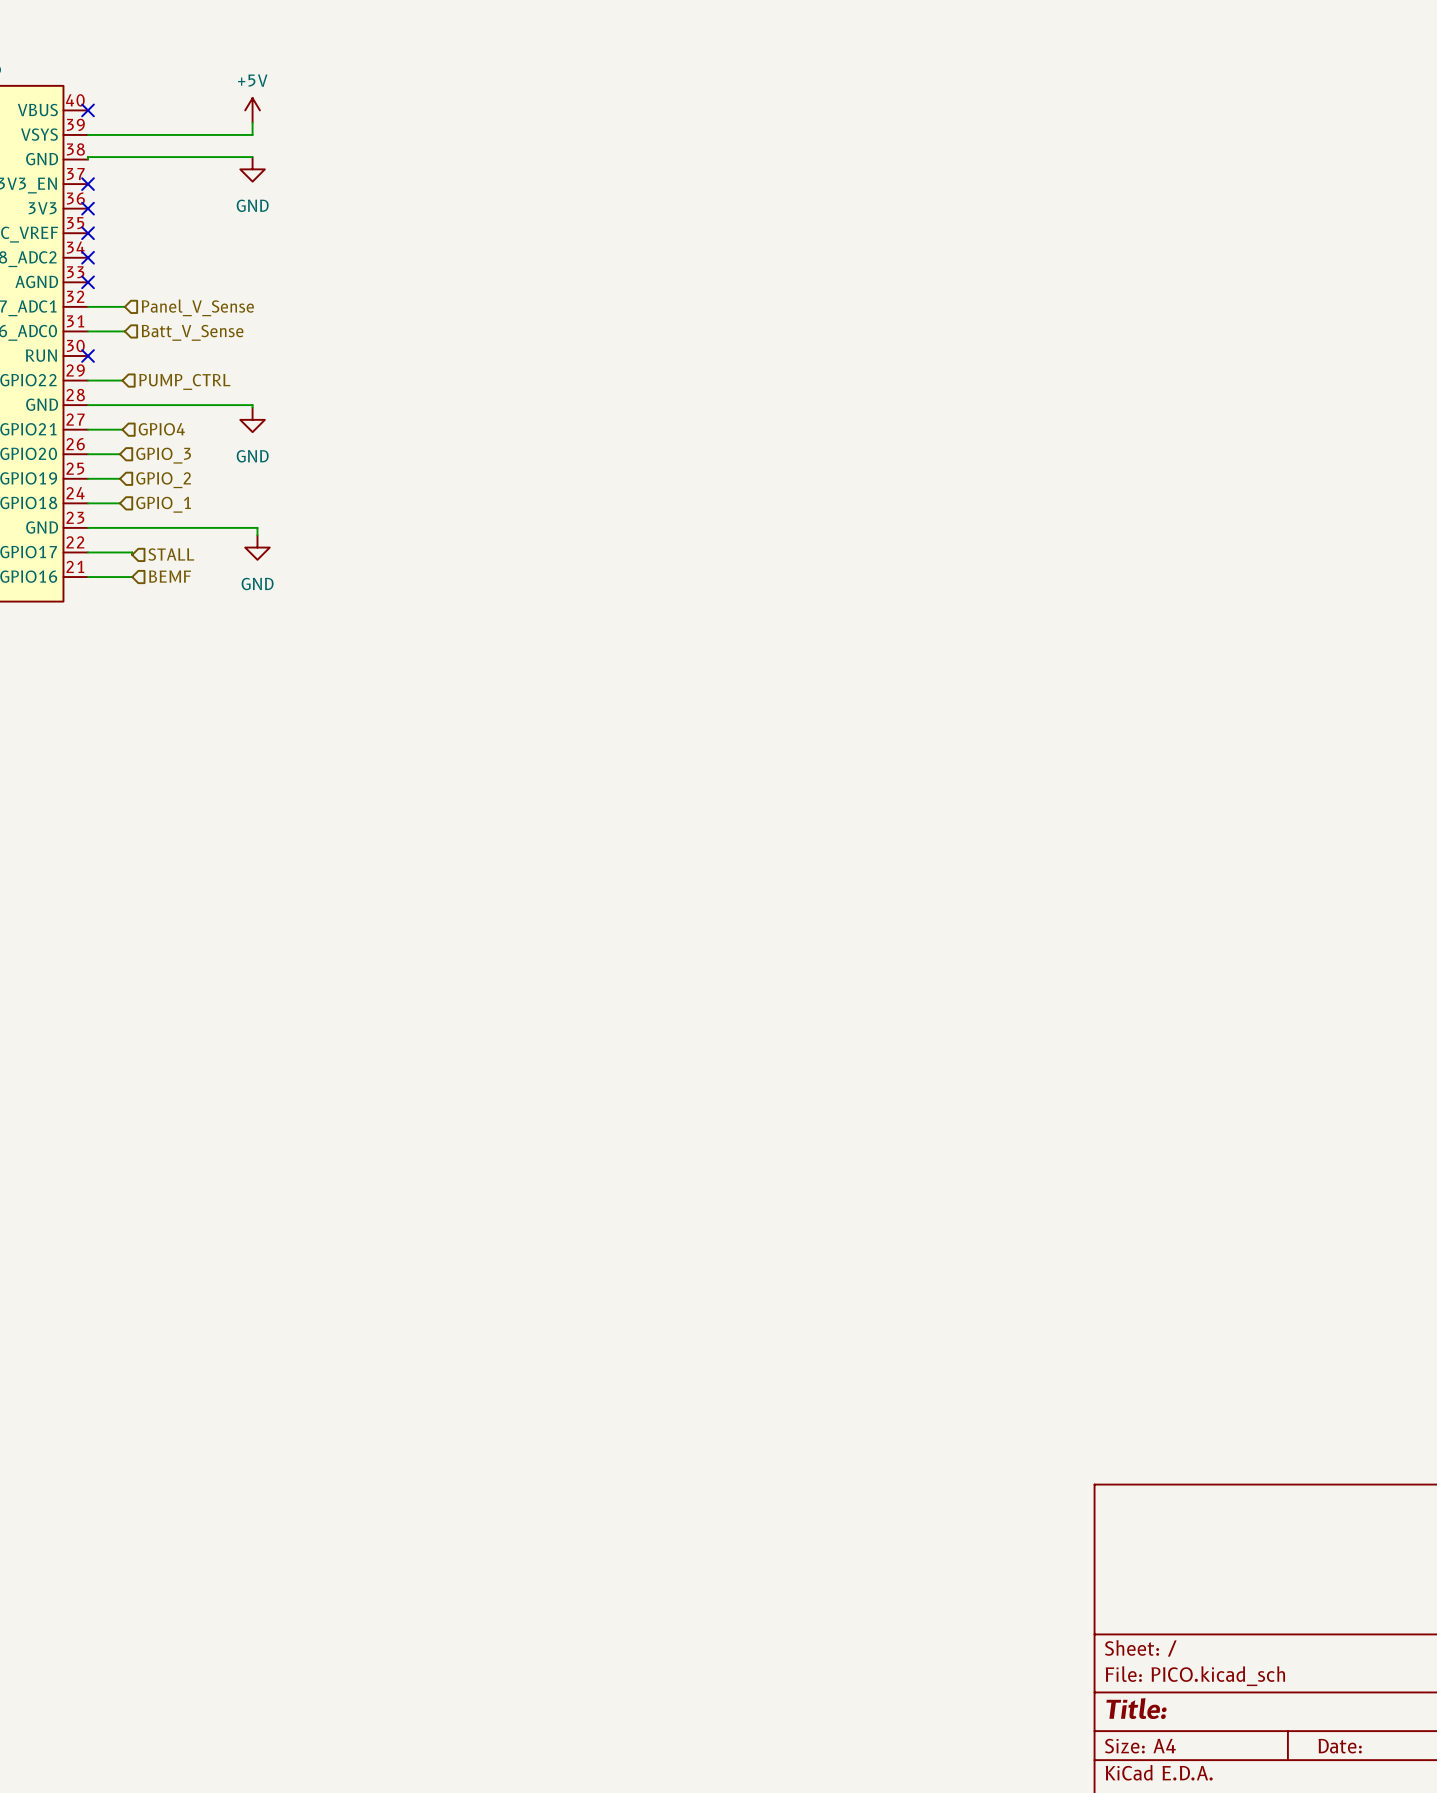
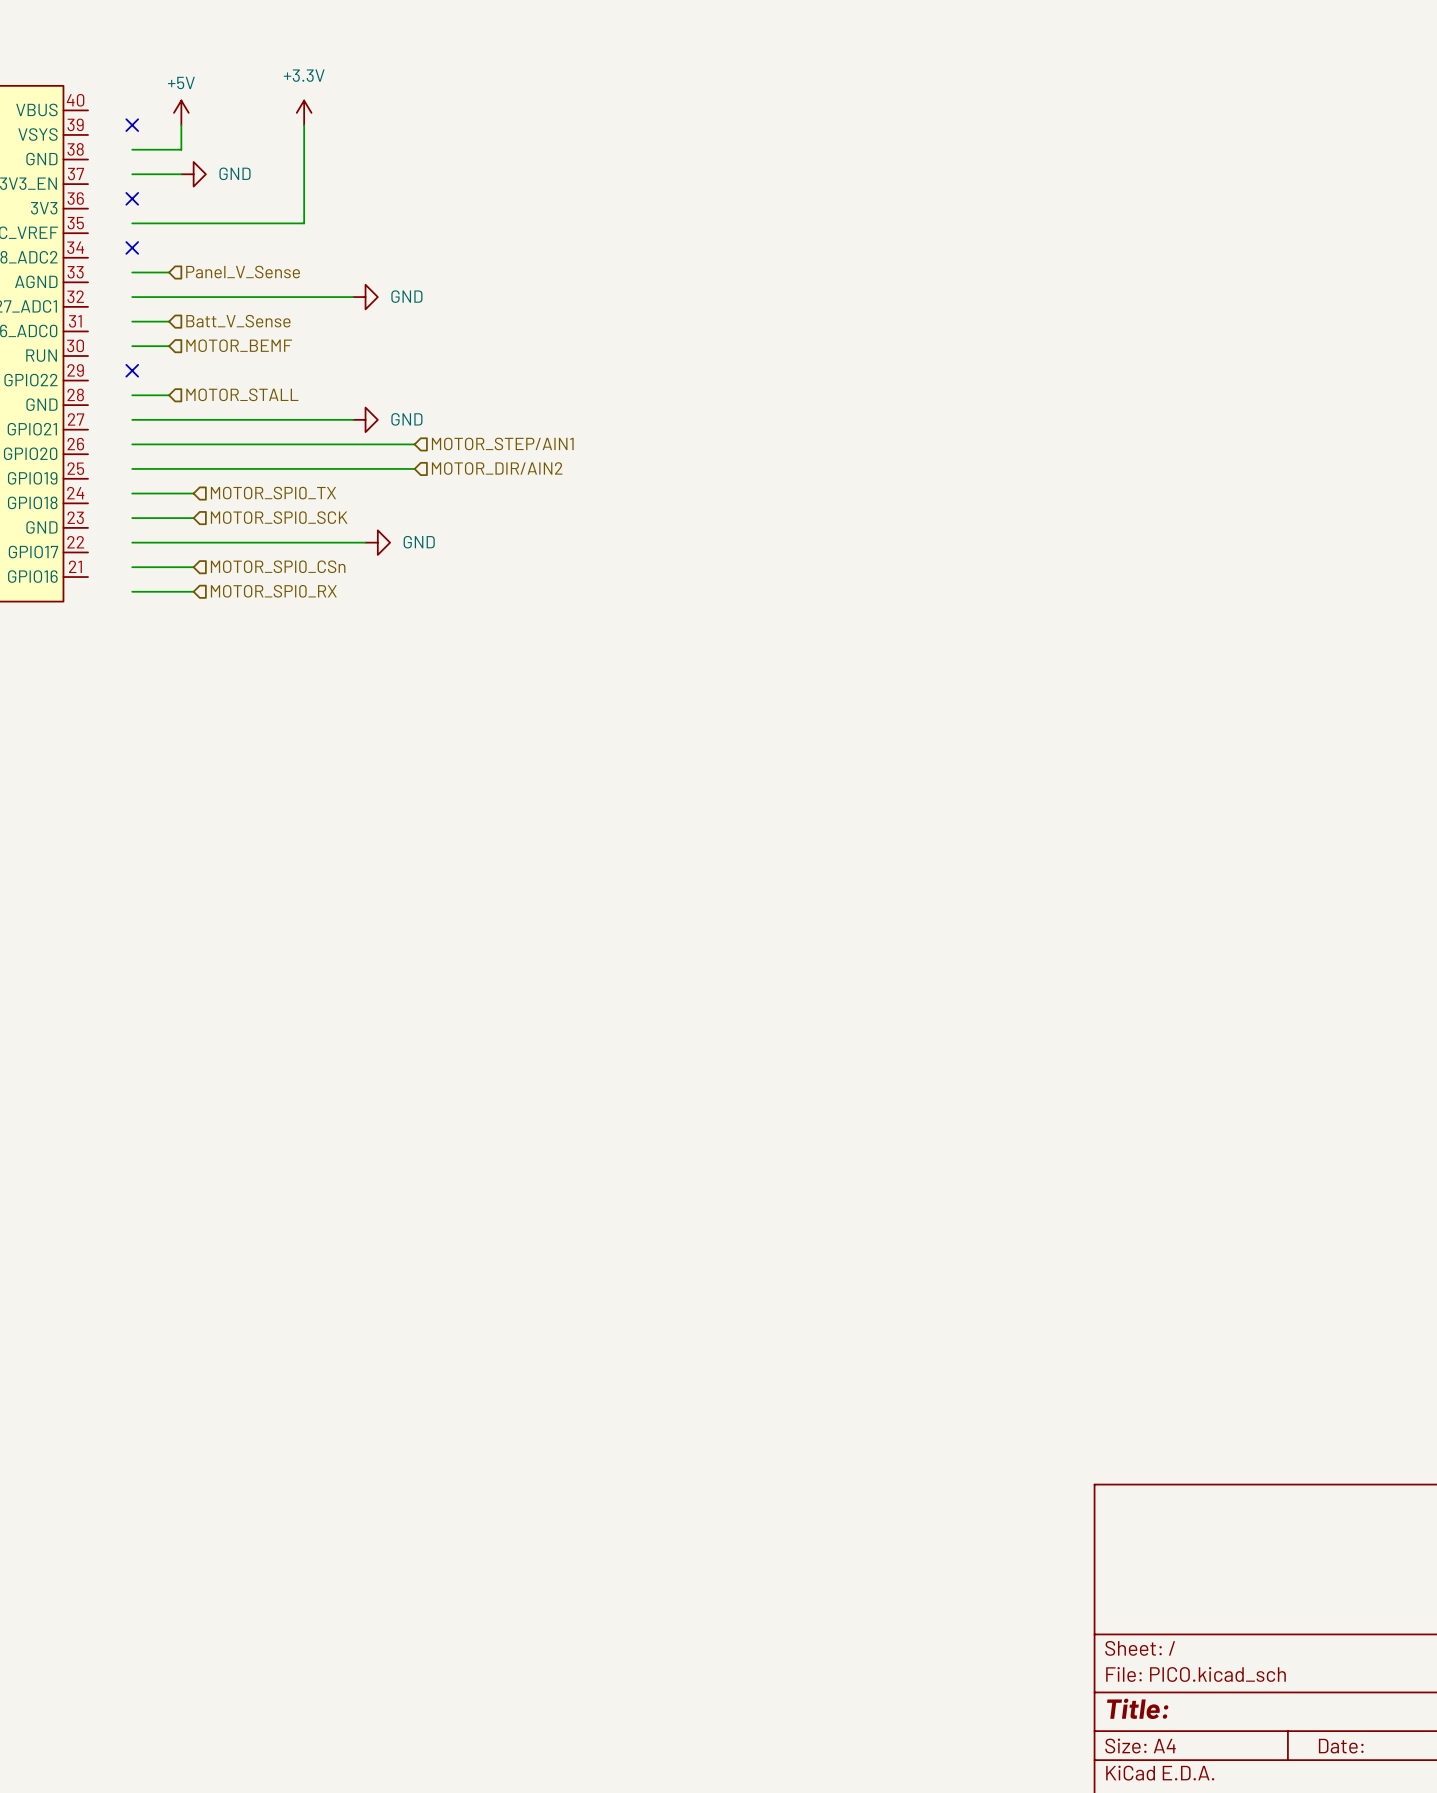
no-connect mark: (88, 110) -> none
power symbol position: +5V (252, 110) -> +5V (181, 112)
power symbol: none -> +3.3V (304, 112)
wire: (252, 122) (252, 134) (88, 134) -> none
no-connect mark: none -> (132, 125)
wire: none -> (181, 125) (181, 149) (132, 149)
wire: none -> (304, 125) (304, 223) (132, 223)
wire: (252, 157) (88, 157) (88, 159) -> none
power symbol rotation: 0° (252, 169) -> 90° counterclockwise (193, 174)
power symbol position: GND (252, 169) -> GND (193, 174)
wire: none -> (132, 174) (181, 174)
no-connect mark: (88, 184) -> none
no-connect mark: none -> (132, 198)
no-connect mark: (88, 208) -> none
no-connect mark: (88, 233) -> none
no-connect mark: none -> (132, 247)
no-connect mark: (88, 257) -> none
wire: none -> (132, 272) (169, 272)
no-connect mark: (88, 282) -> none
wire: none -> (132, 297) (353, 297)
power symbol: none -> GND (365, 297)
wire: (88, 306) (124, 306) -> (132, 321) (169, 321)
hierarchical label position: Panel_V_Sense (197, 307) -> Panel_V_Sense (243, 272)
wire: (88, 331) (124, 331) -> (132, 346) (169, 346)
hierarchical label position: Batt_V_Sense (192, 332) -> Batt_V_Sense (238, 321)
hierarchical label: none -> MOTOR_BEMF (239, 345)
no-connect mark position: (88, 356) -> (132, 370)
wire: (88, 380) (122, 380) -> none
hierarchical label: PUMP_CTRL (184, 381) -> none
wire: none -> (132, 395) (169, 395)
hierarchical label: none -> MOTOR_STALL (242, 394)
wire: (88, 405) (252, 405) (252, 407) -> none
wire: none -> (132, 419) (353, 419)
power symbol: GND (252, 419) -> none
power symbol: none -> GND (365, 419)
wire: (88, 429) (122, 429) -> none
hierarchical label: GPIO4 (161, 429) -> none
wire: none -> (132, 444) (414, 444)
hierarchical label: none -> MOTOR_STEP/AIN1 (502, 443)
wire: (88, 454) (119, 454) -> none
hierarchical label: GPIO_3 (163, 455) -> none
wire: none -> (132, 468) (414, 468)
hierarchical label: none -> MOTOR_DIR/AIN2 (497, 468)
wire: (88, 478) (119, 478) -> none
hierarchical label: GPIO_2 (163, 480) -> none
wire: none -> (132, 493) (193, 493)
hierarchical label: none -> MOTOR_SPI0_TX (273, 493)
wire: (88, 503) (119, 503) -> none
hierarchical label: GPIO_1 (163, 504) -> none
wire: none -> (132, 518) (193, 518)
hierarchical label: none -> MOTOR_SPI0_SCK (279, 517)
wire: (88, 527) (257, 527) (257, 535) -> none
wire: none -> (132, 542) (365, 542)
power symbol: none -> GND (377, 542)
power symbol: GND (257, 547) -> none
wire: (88, 552) (132, 552) (132, 554) -> none
hierarchical label: STALL (171, 554) -> none
wire: none -> (132, 567) (193, 567)
hierarchical label: none -> MOTOR_SPI0_CSn (278, 566)
hierarchical label: BEMF (170, 576) -> none
wire: (88, 577) (132, 577) -> none
wire: none -> (132, 591) (193, 591)
hierarchical label: none -> MOTOR_SPI0_RX (273, 591)

